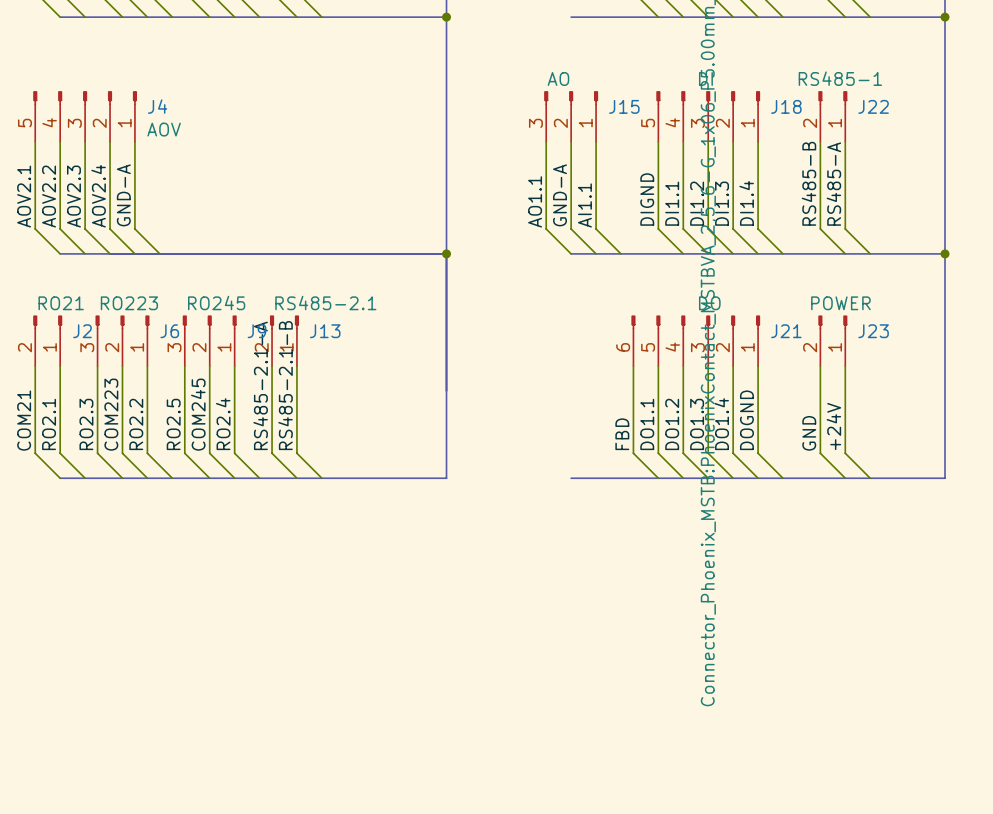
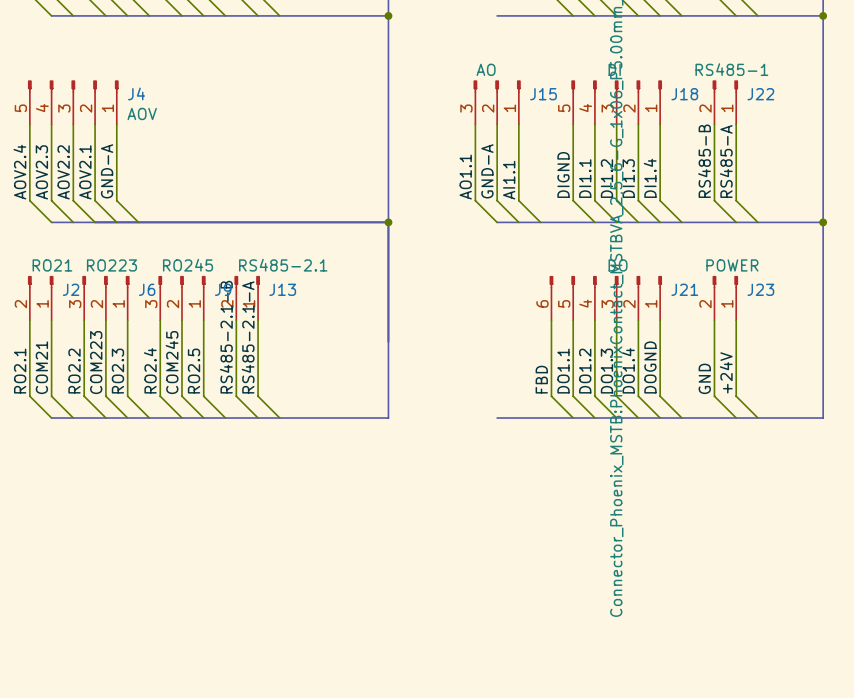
label: AOV2.1 (24, 196) -> AOV2.4 (19, 172)
label: AOV2.2 (49, 196) -> AOV2.3 (41, 172)
label: AOV2.3 (73, 196) -> AOV2.2 (63, 172)
label: AOV2.4 (98, 196) -> AOV2.1 (85, 172)
label: RS485-2.1-A (260, 385) -> RS485-2.1-B (226, 337)
label: RS485-2.1-B (285, 385) -> RS485-2.1-A (248, 337)
label: COM21 (24, 420) -> RO2.1 (20, 371)
label: RO2.1 (49, 424) -> COM21 (41, 367)
label: RO2.3 (86, 424) -> RO2.2 (74, 371)
label: RO2.2 (136, 424) -> RO2.3 (117, 371)
label: RO2.5 (173, 424) -> RO2.4 (150, 370)
label: RO2.4 (223, 424) -> RO2.5 (194, 371)

